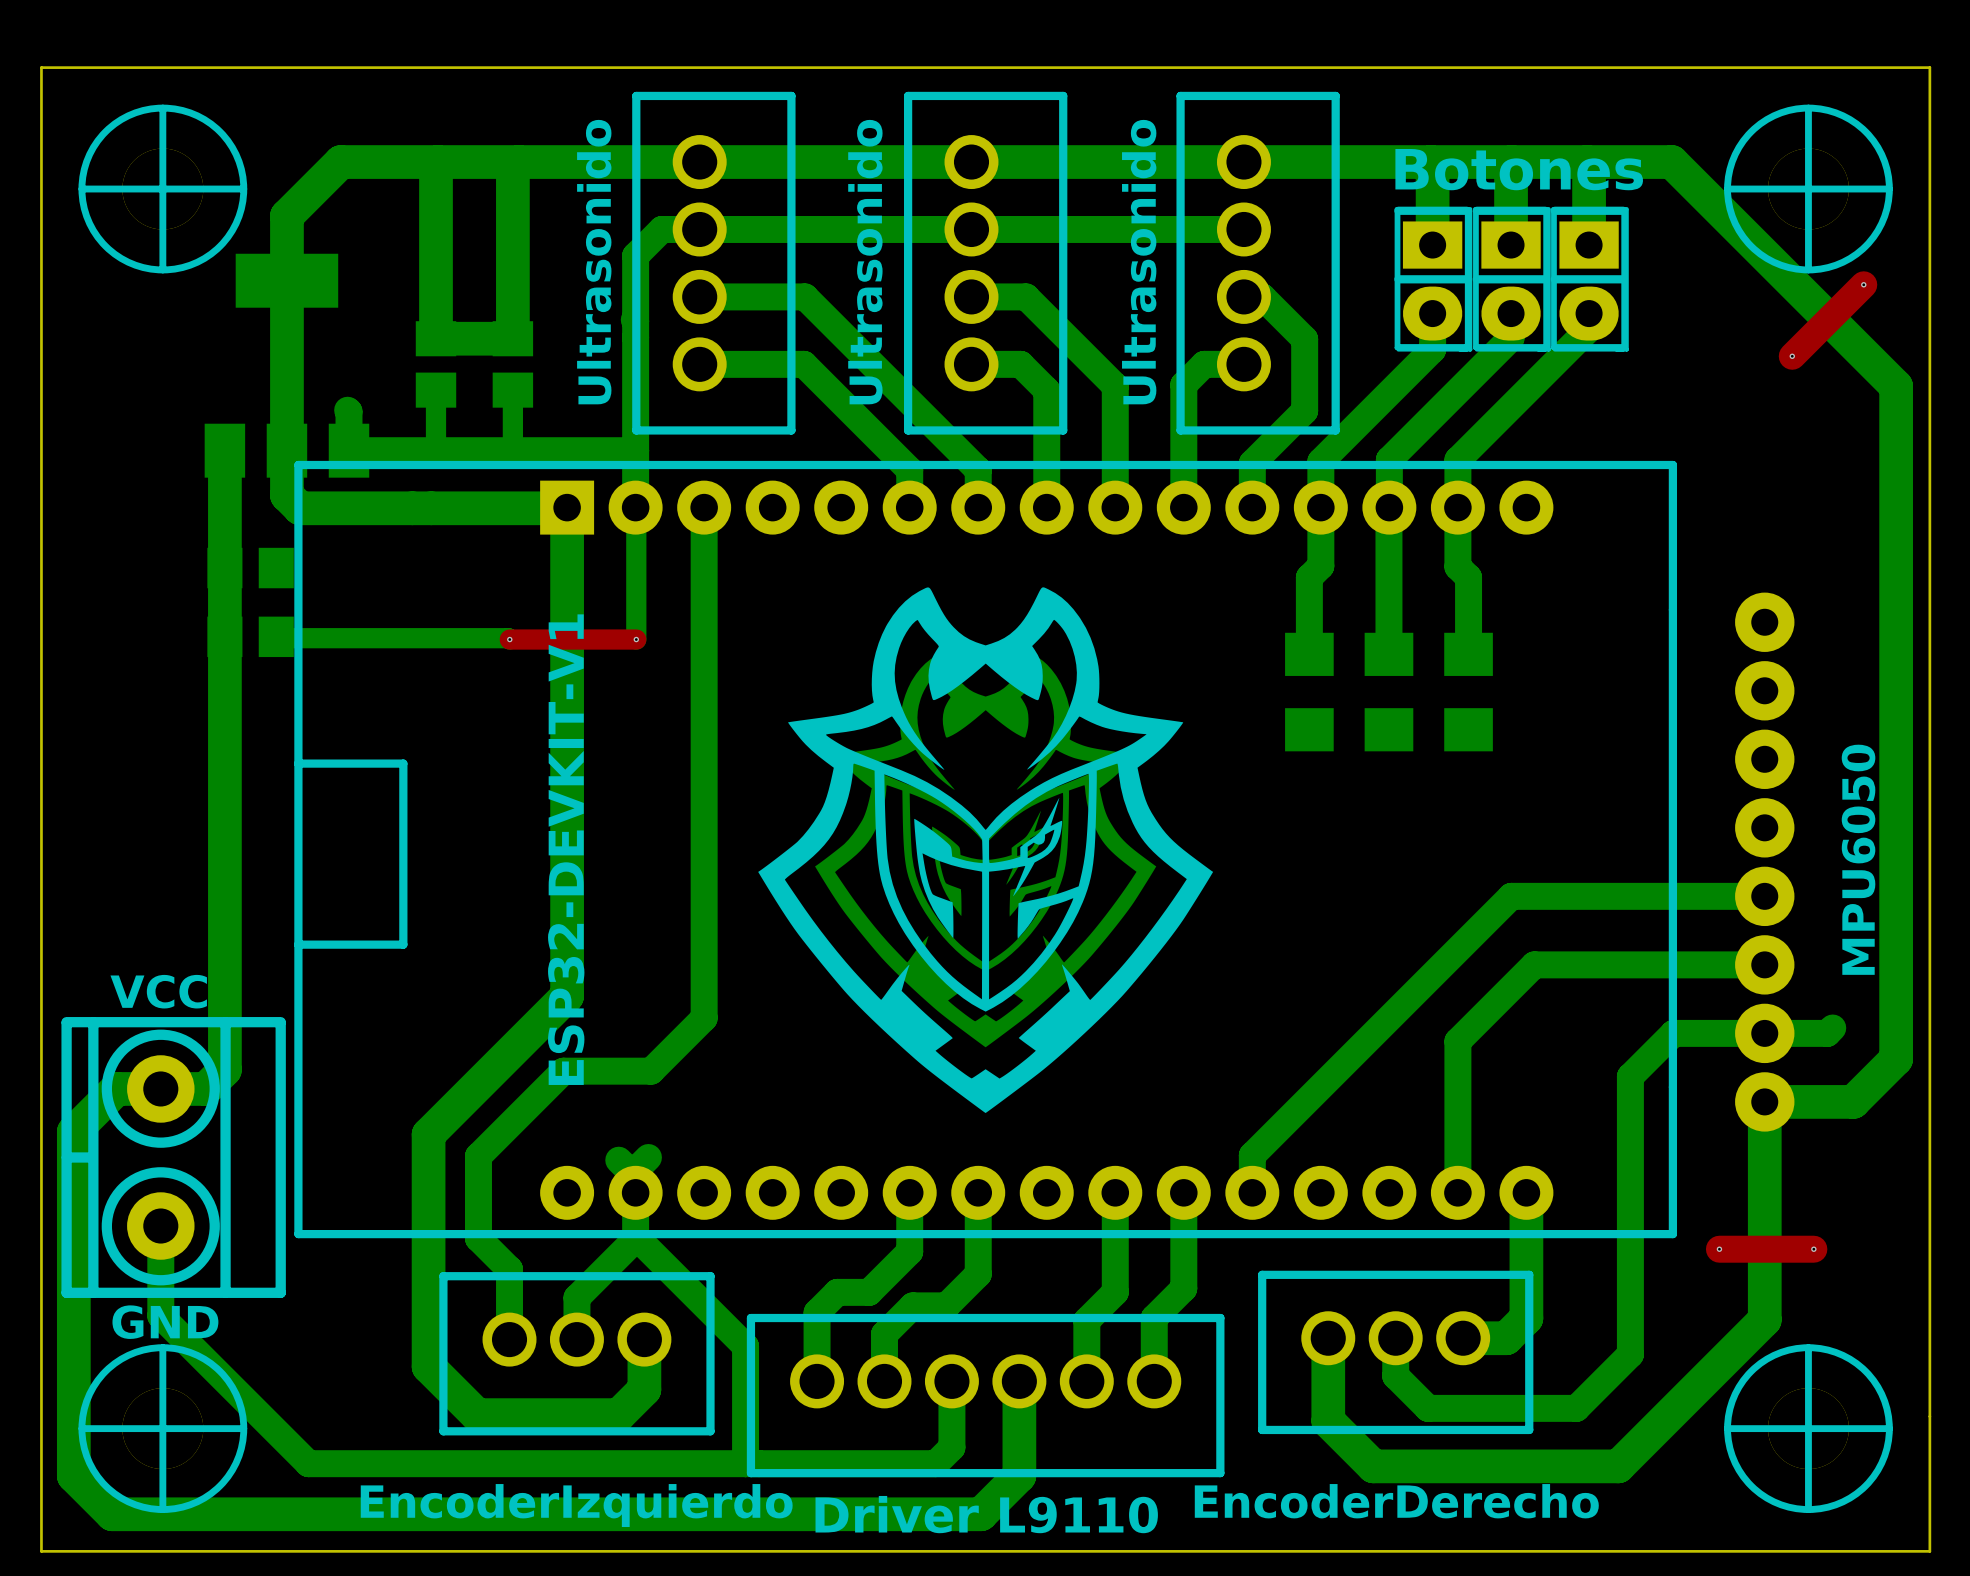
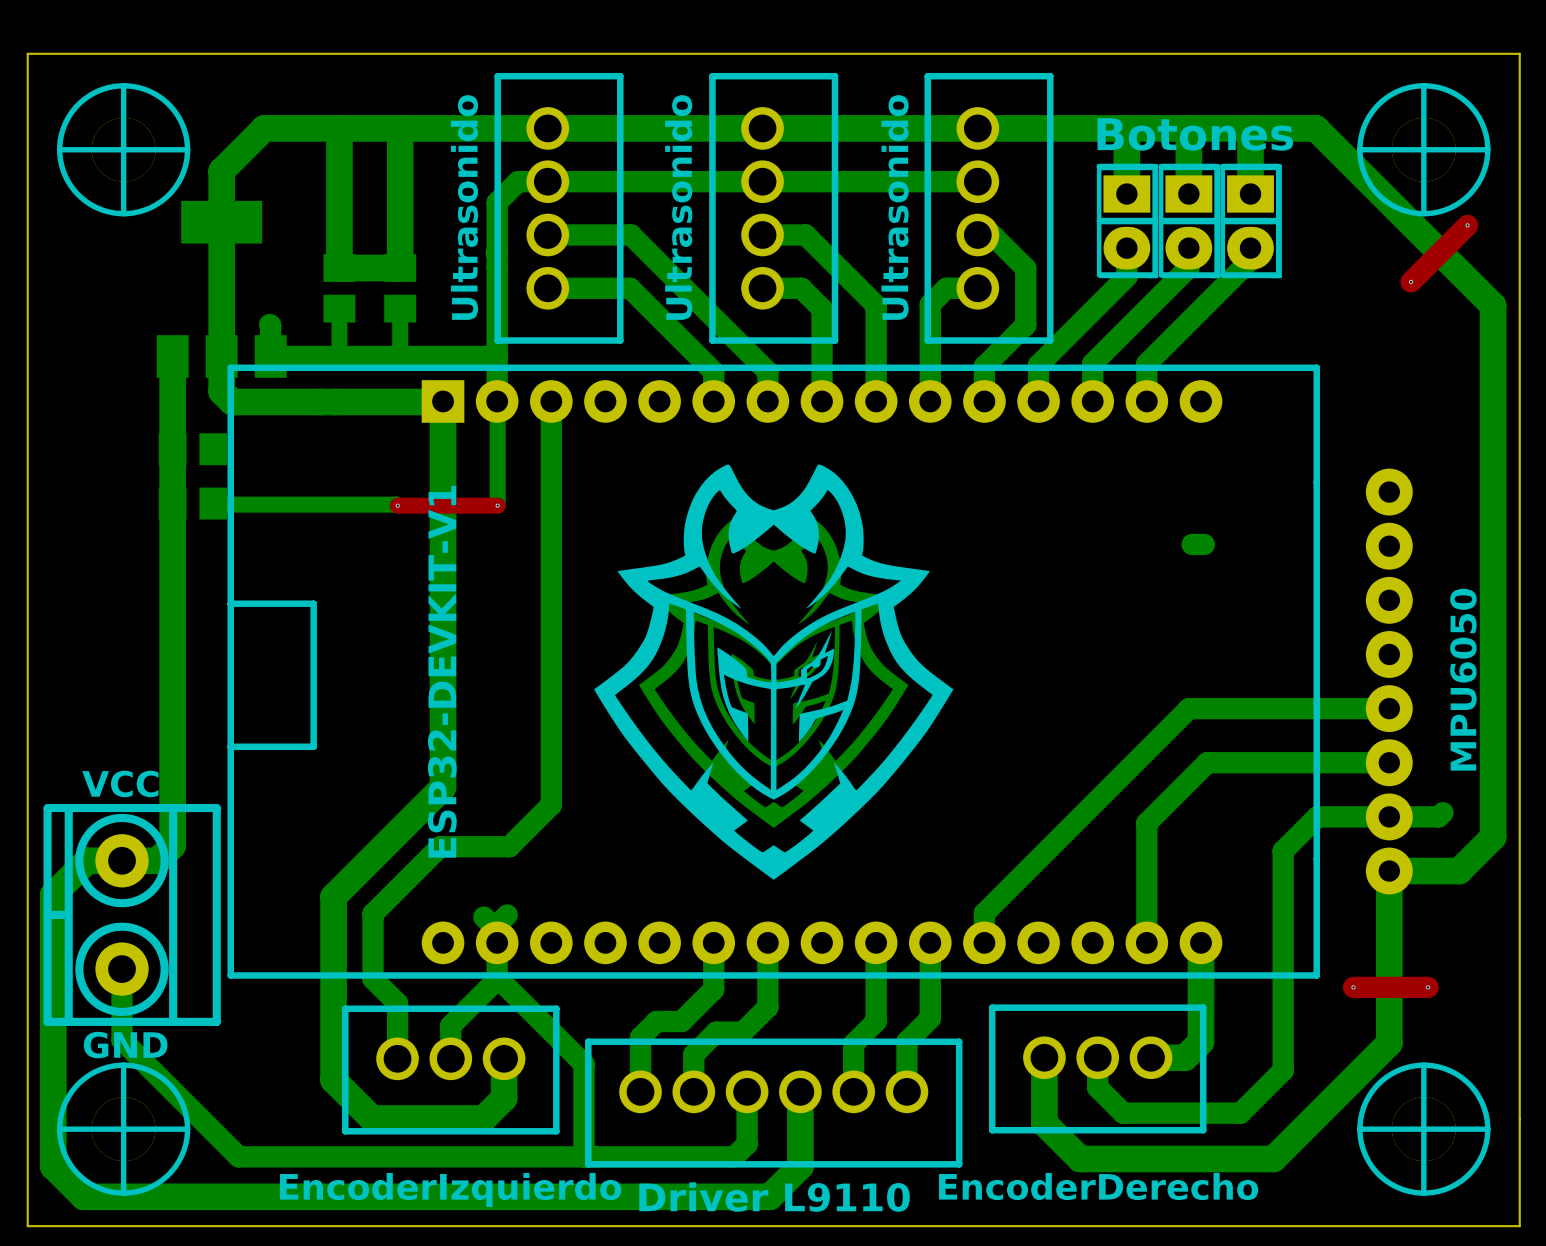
bottom track: (1389, 507) (1388, 654) -> none
bottom track: (1320, 508) (1320, 566) (1309, 577) (1309, 654) -> none
bottom track: (1457, 508) (1457, 566) (1468, 577) (1468, 654) -> none
bottom track: none -> (1192, 544) (1204, 544)
part: (1309, 692) -> none
part: (1388, 692) -> none
part: (1468, 692) -> none

